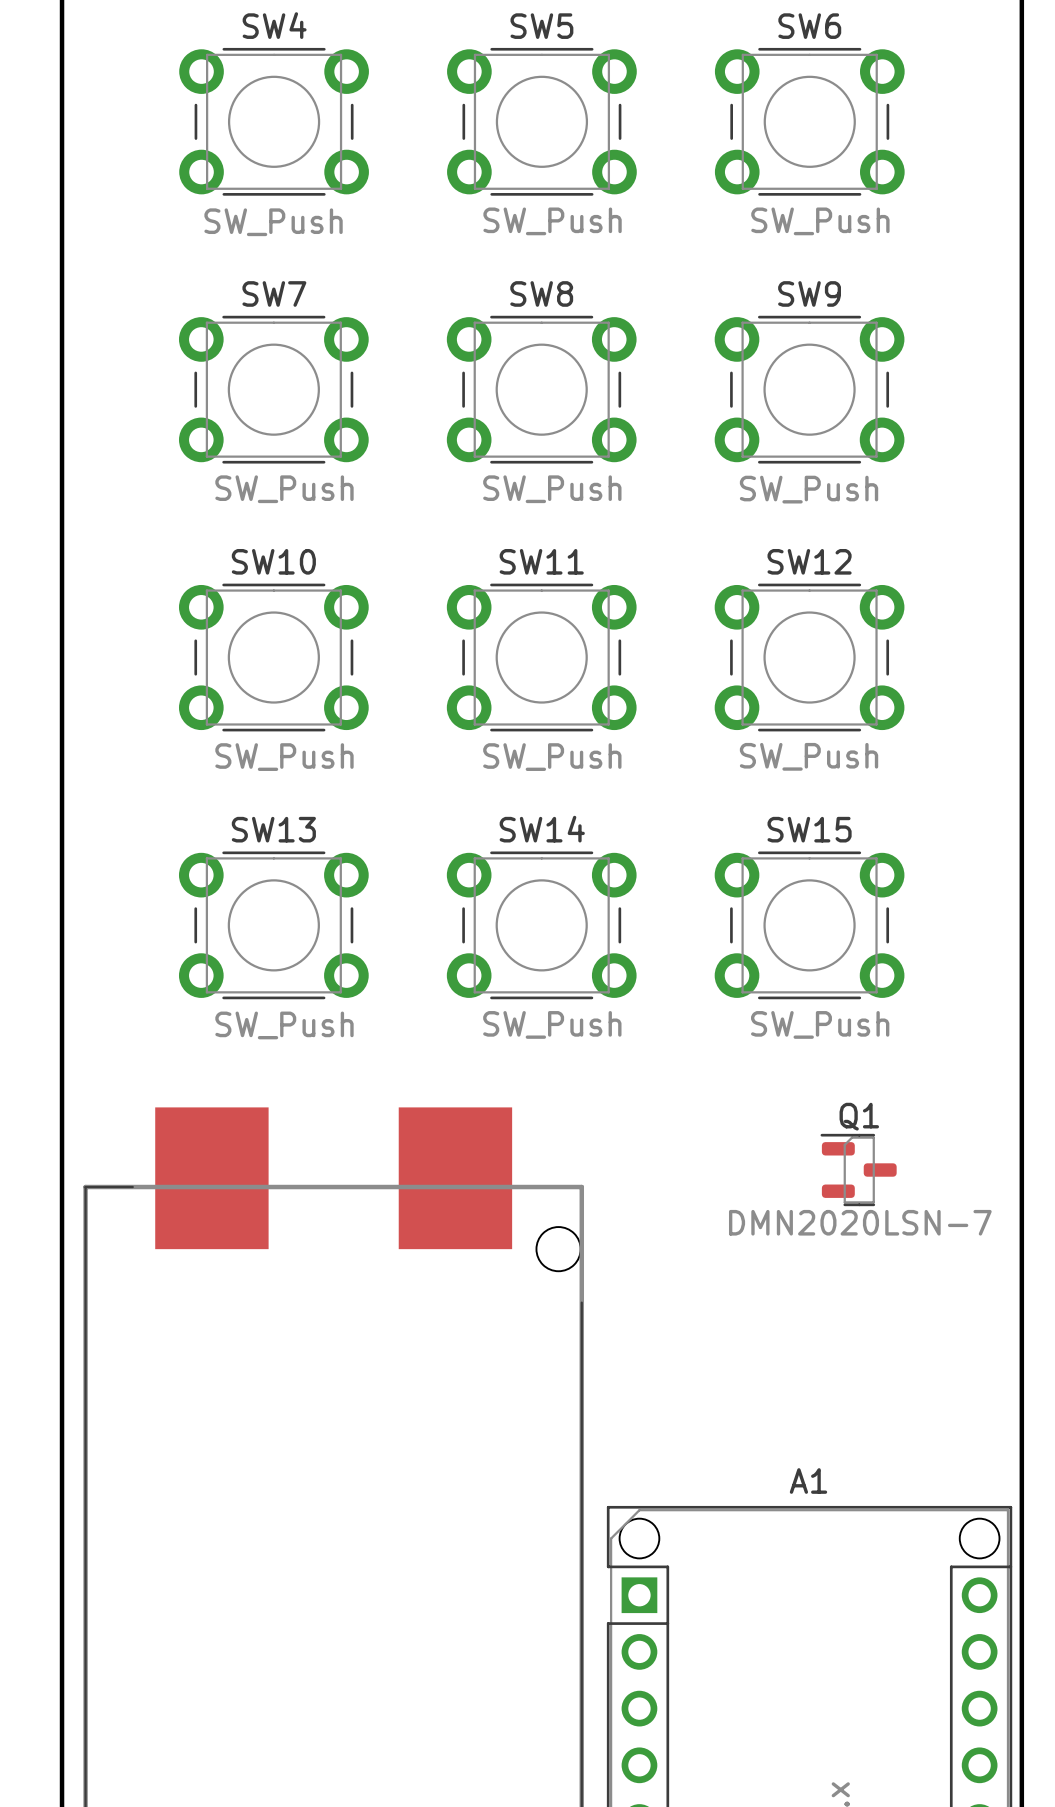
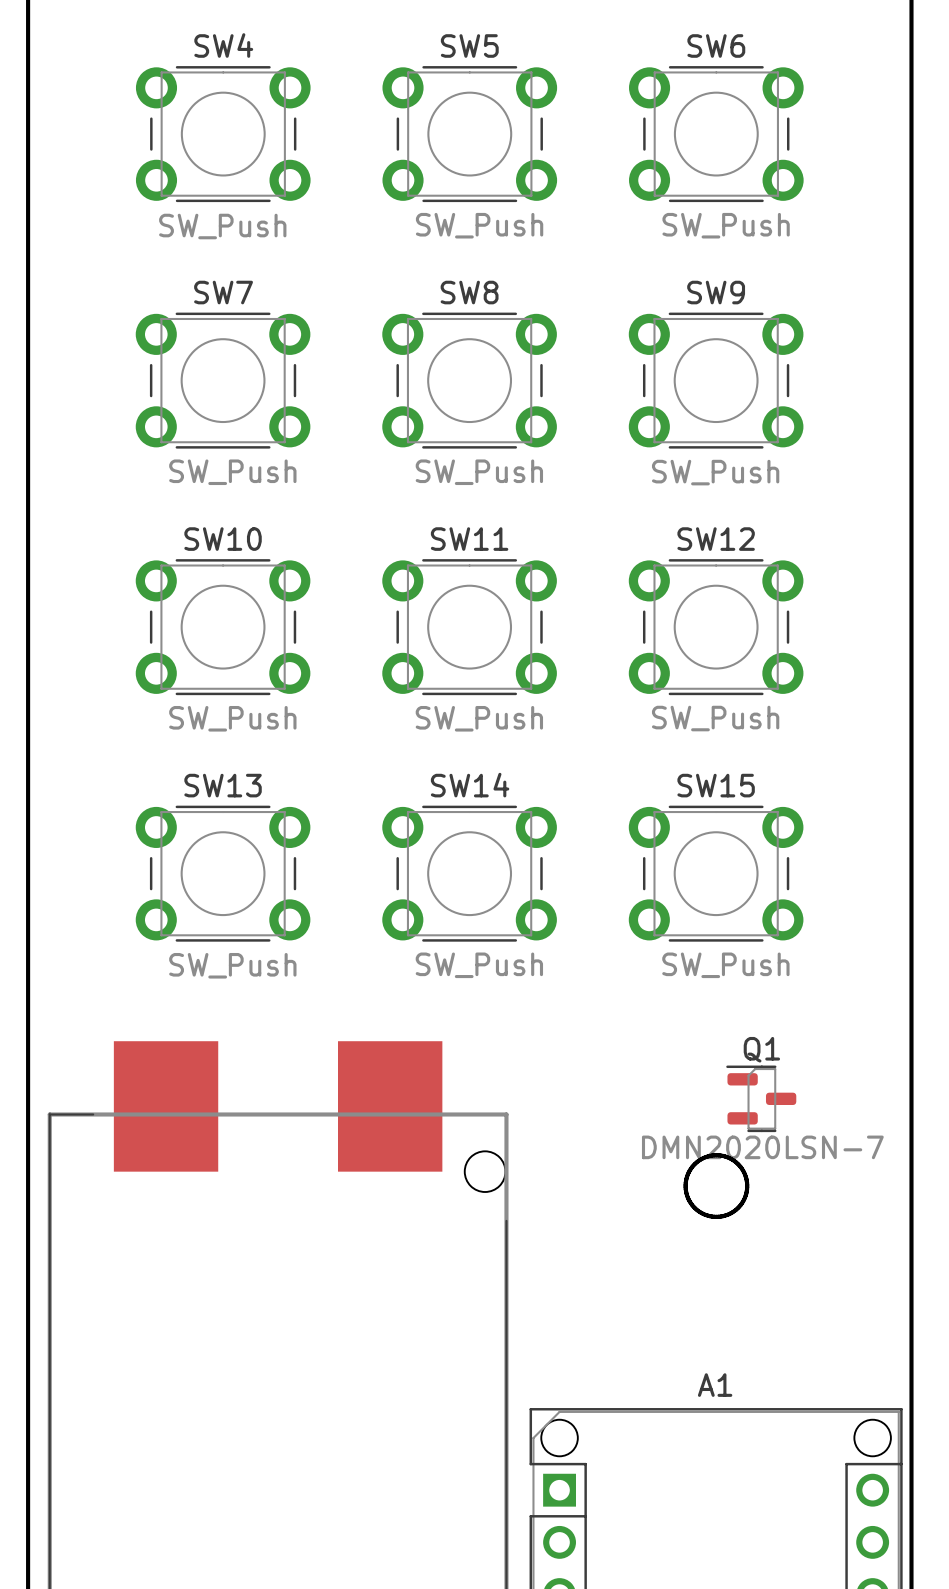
board edge: none -> (714, 1155) (703, 1157) (693, 1165) (687, 1176) (685, 1189) (688, 1199) (696, 1209) (707, 1215) (718, 1216) (730, 1213) (740, 1205) (745, 1195) (747, 1182) (744, 1172) (736, 1162) (724, 1156) (714, 1155)

